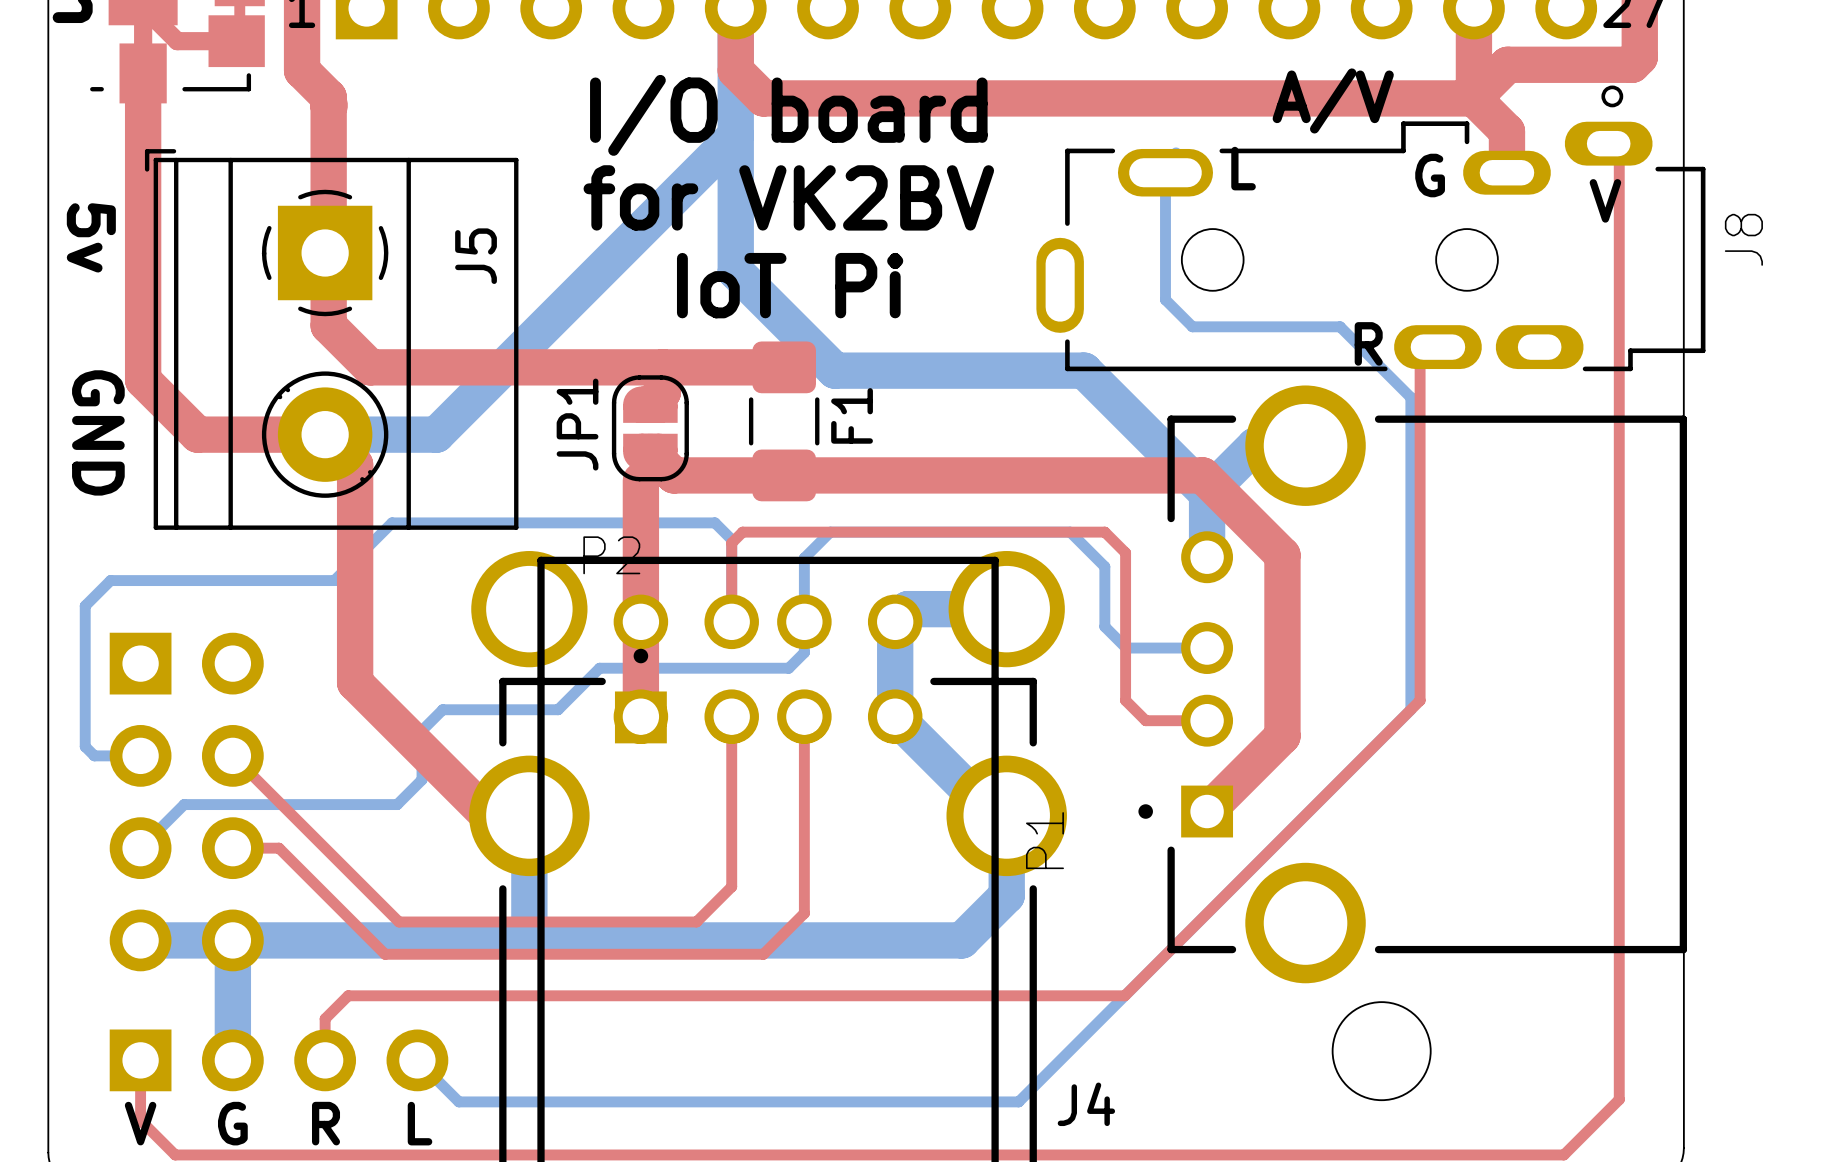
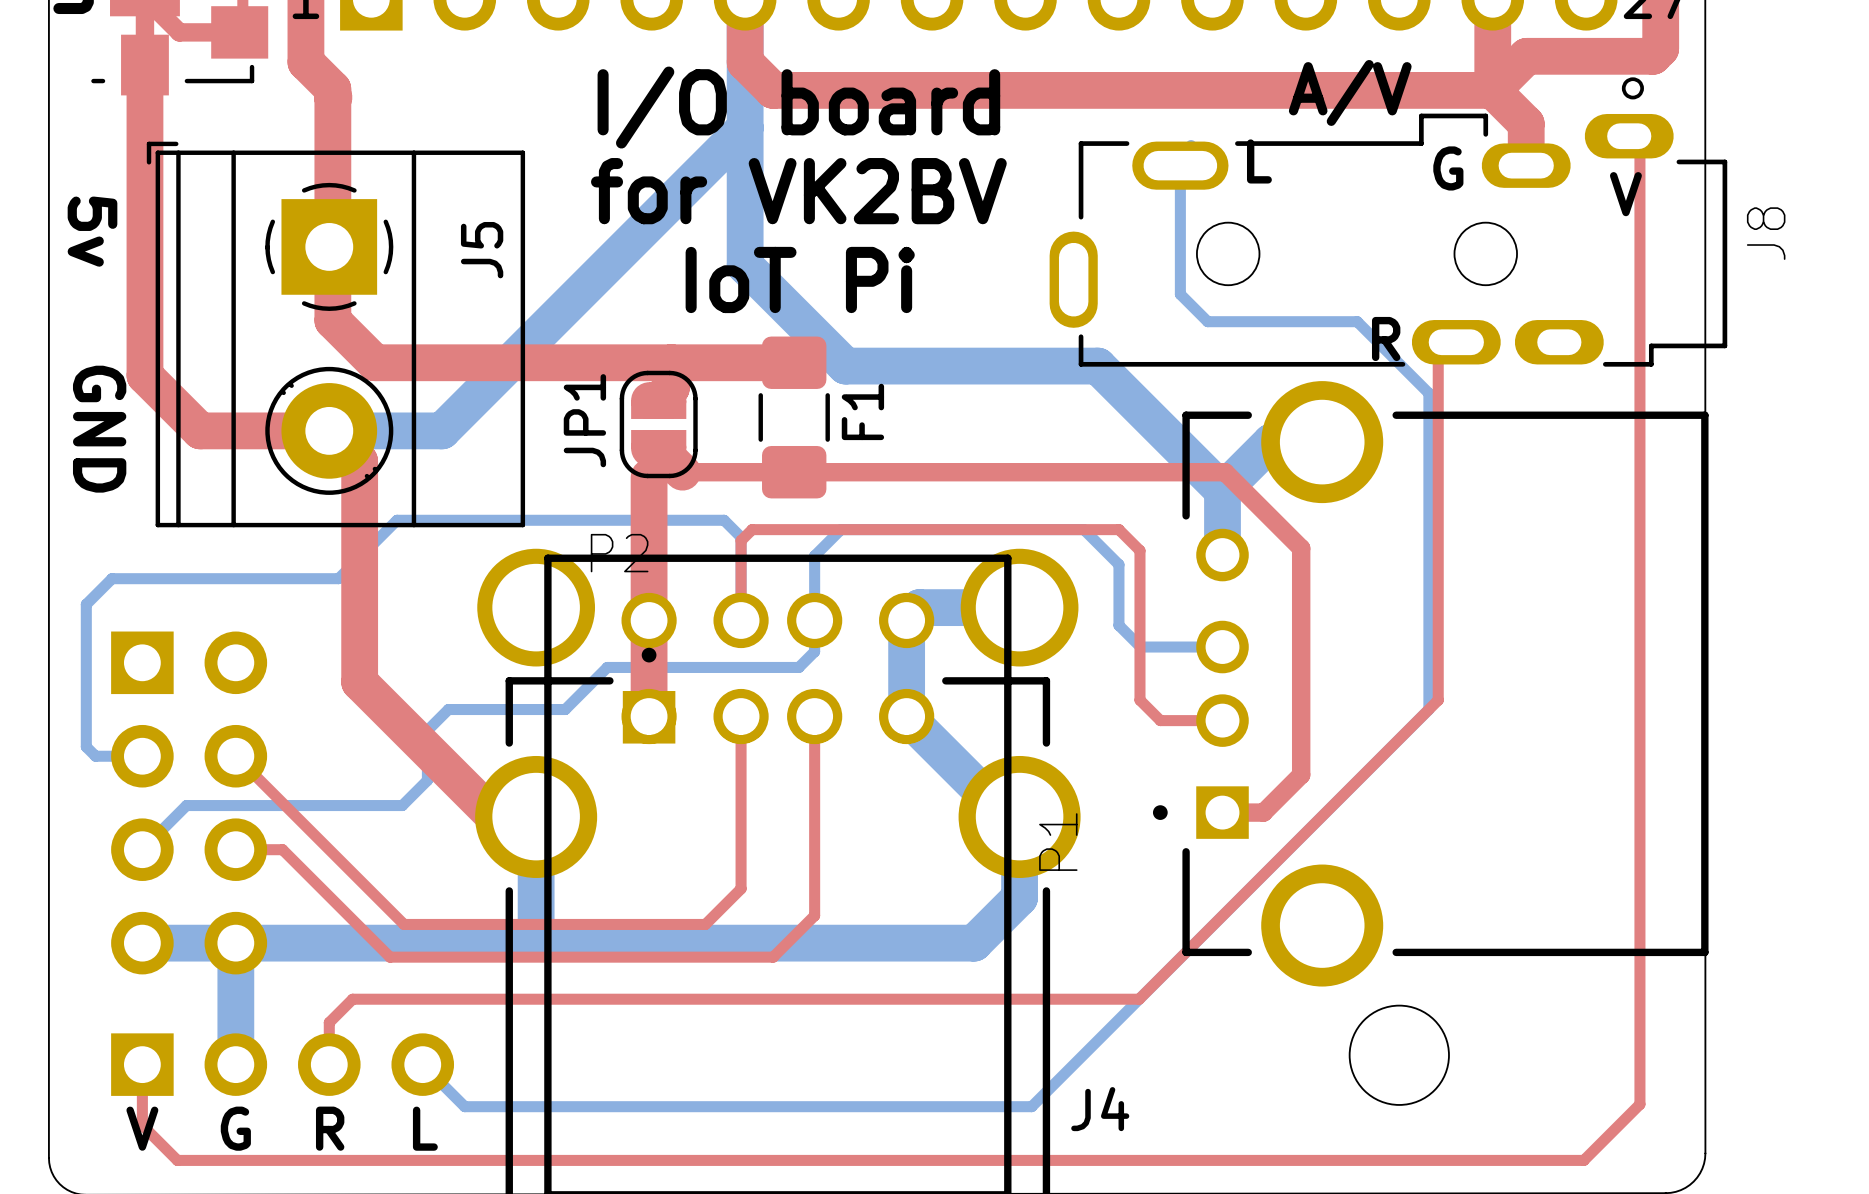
top track width: thick (673, 475) (1202, 475) -> thin (682, 472) (1218, 472)
top track: (1202, 475) (1282, 555) (1282, 736) (1207, 811) -> (1218, 472) (1225, 472) (1301, 548) (1301, 774) (1263, 812) (1222, 812)

